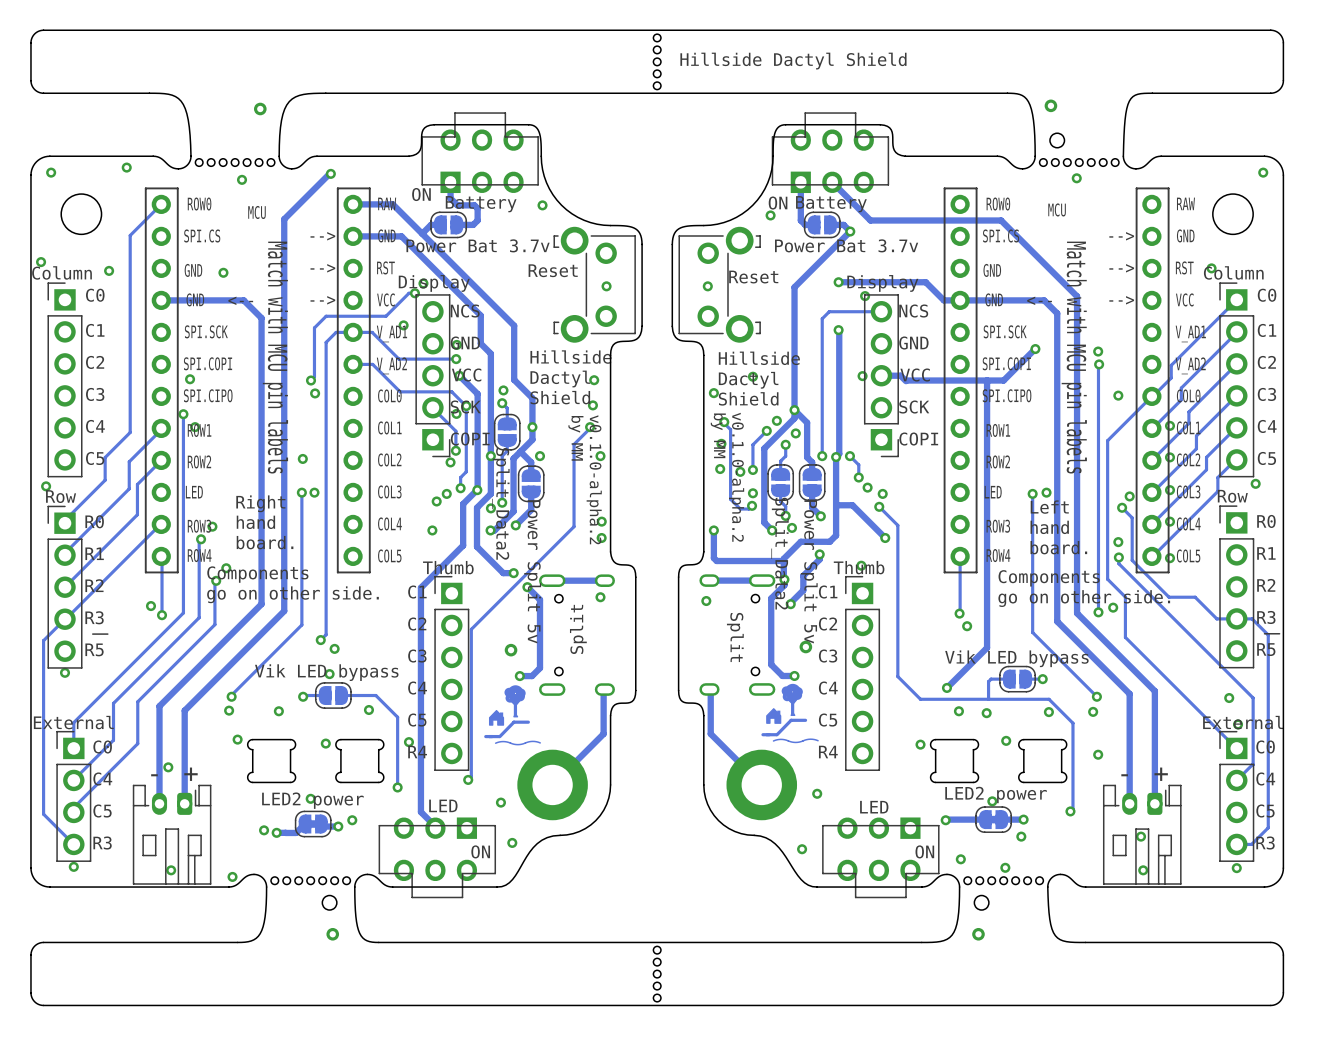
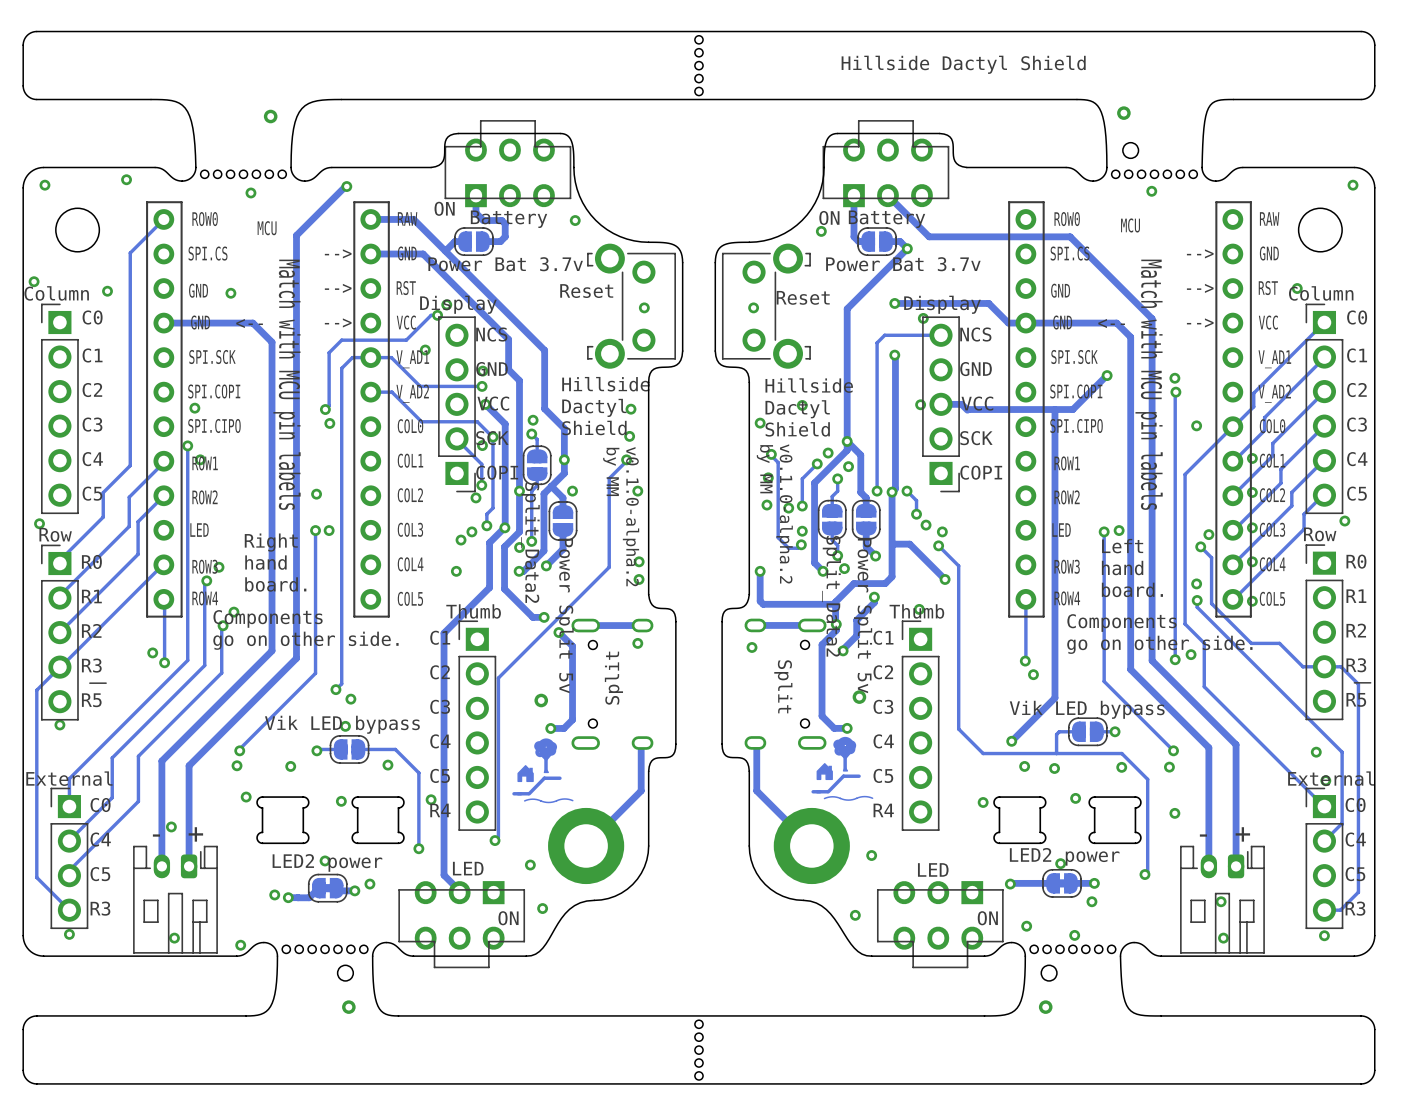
text position: Hillside Dactyl Shield (793, 61) -> Hillside Dactyl Shield (963, 64)

